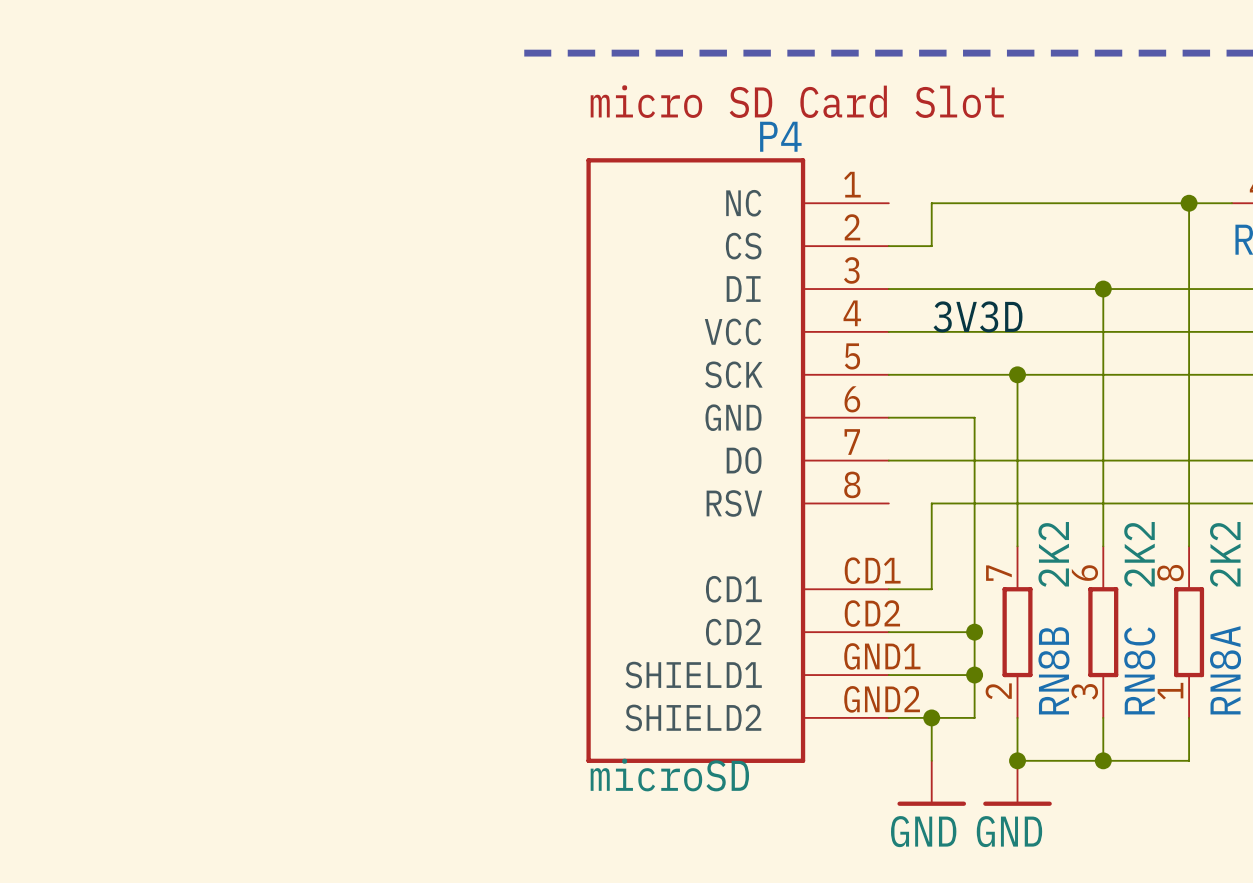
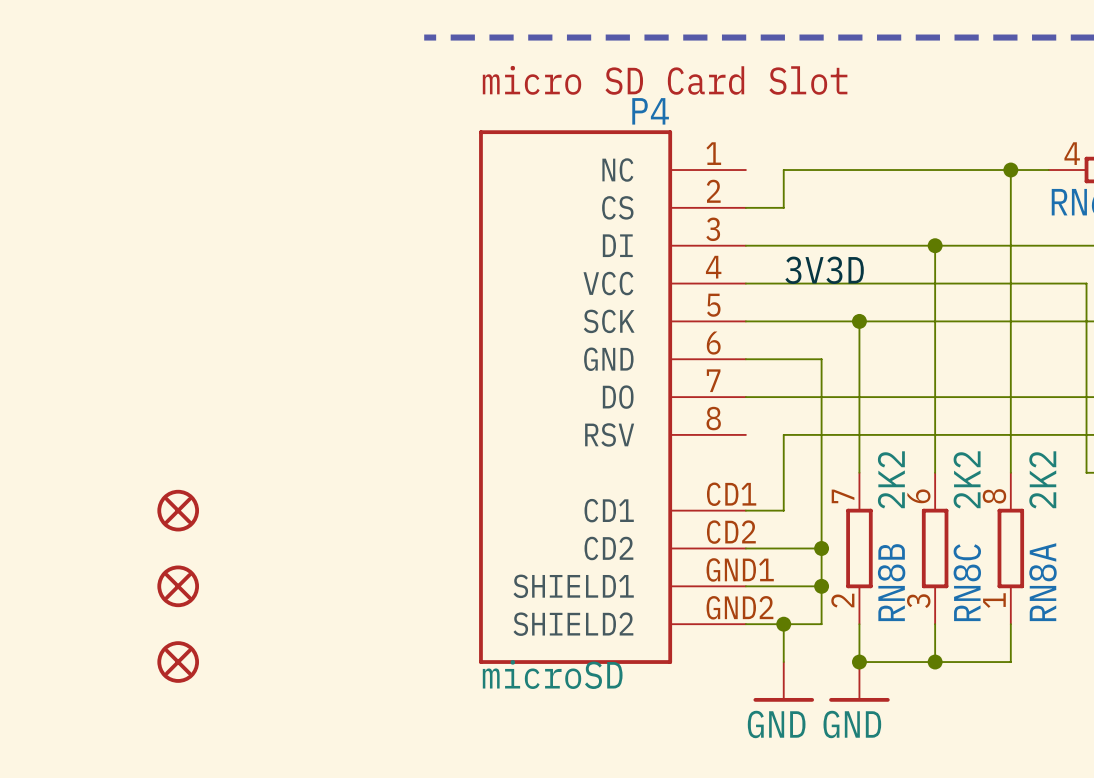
part: none -> (178, 510)
part: none -> (178, 586)
part: none -> (178, 662)

